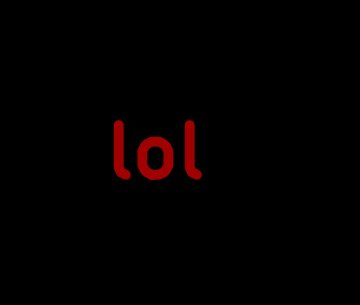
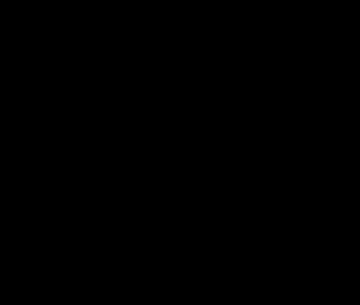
text: lol (157, 149) -> none

